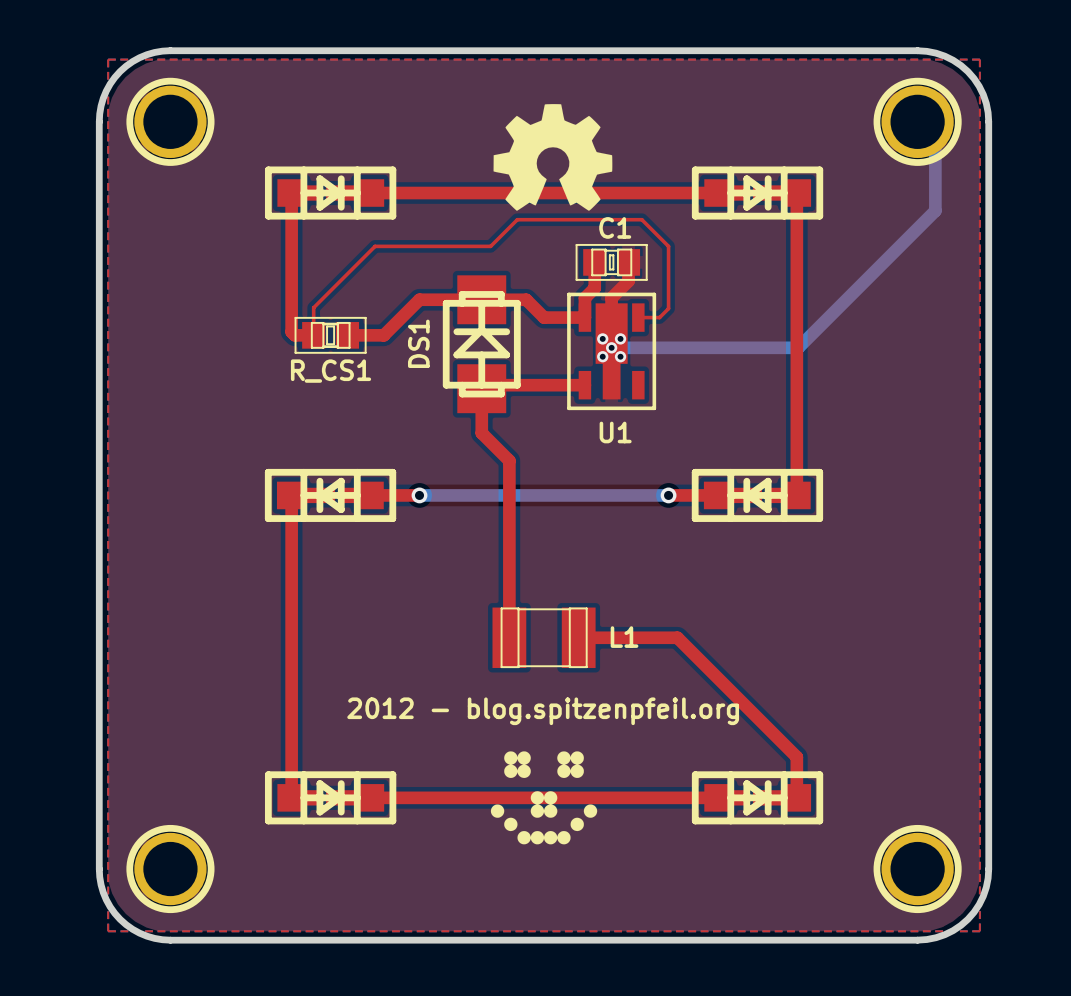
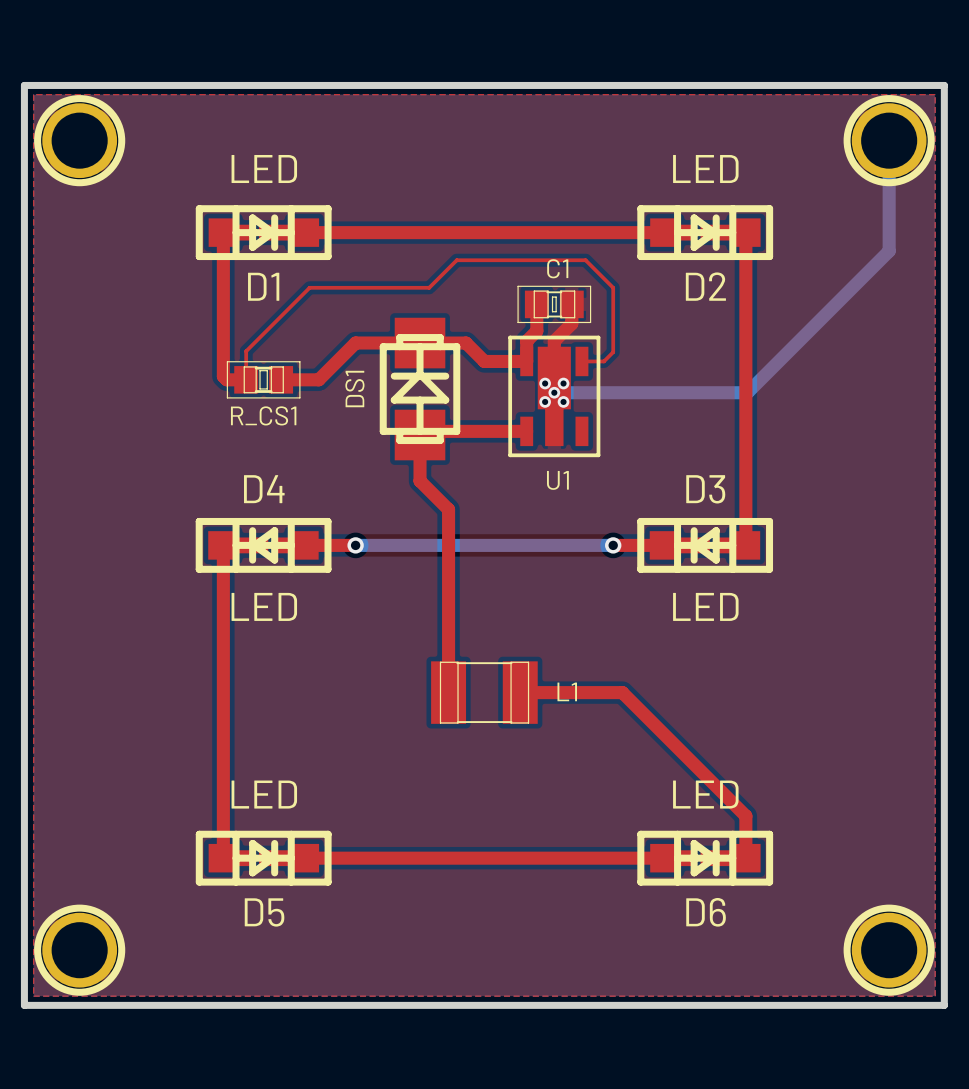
board edge: (170, 50) (146, 54) (132, 61) (120, 71) (110, 83) (103, 98) (99, 121) -> (98, 85) (24, 85) (24, 159)
board edge: (917, 50) (944, 56) (967, 71) (983, 94) (988, 121) -> (870, 85) (944, 85) (944, 159)
drawing: [493, 104, 613, 211] -> none
part position: (170, 121) -> (79, 140)
part position: (917, 121) -> (889, 140)
D1 value: none -> LED (264, 169)
D2 value: none -> LED (705, 169)
D1 name: none -> D1 (263, 286)
D2 name: none -> D2 (705, 286)
D4 name: none -> D4 (264, 489)
D3 name: none -> D3 (705, 489)
D4 value: none -> LED (264, 606)
D3 value: none -> LED (705, 606)
text: 2012 - blog.spitzenpfeil.org (543, 711) -> none
D5 value: none -> LED (264, 794)
D6 value: none -> LED (705, 794)
drawing: [490, 751, 598, 845] -> none
D5 name: none -> D5 (264, 912)
D6 name: none -> D6 (706, 912)
board edge: (99, 869) (101, 884) (106, 899) (120, 919) (132, 929) (146, 936) (170, 940) -> (24, 931) (24, 1005) (98, 1005)
part position: (170, 869) -> (79, 950)
part position: (917, 869) -> (889, 950)
board edge: (988, 869) (983, 896) (967, 919) (944, 934) (917, 940) -> (944, 931) (944, 1005) (870, 1005)

